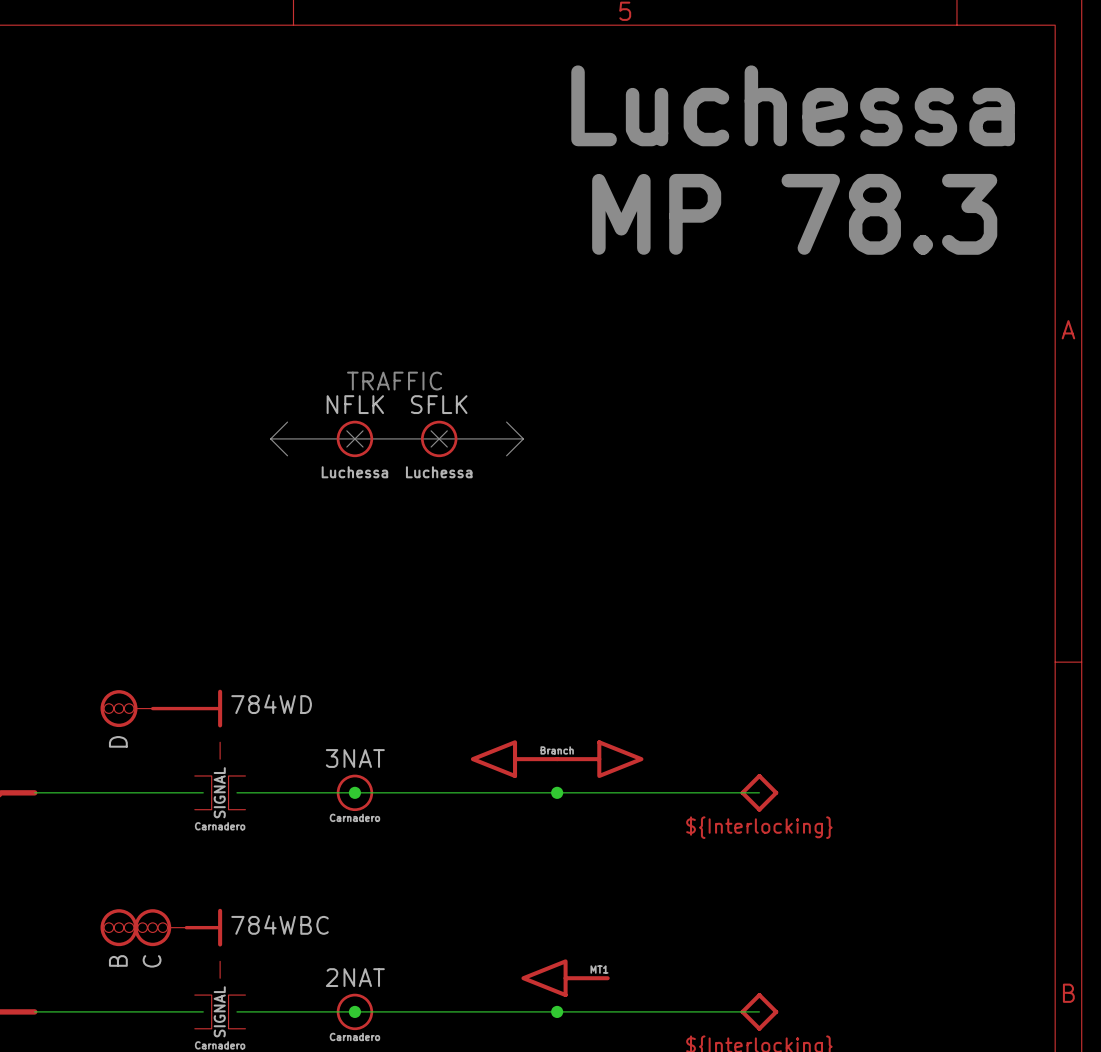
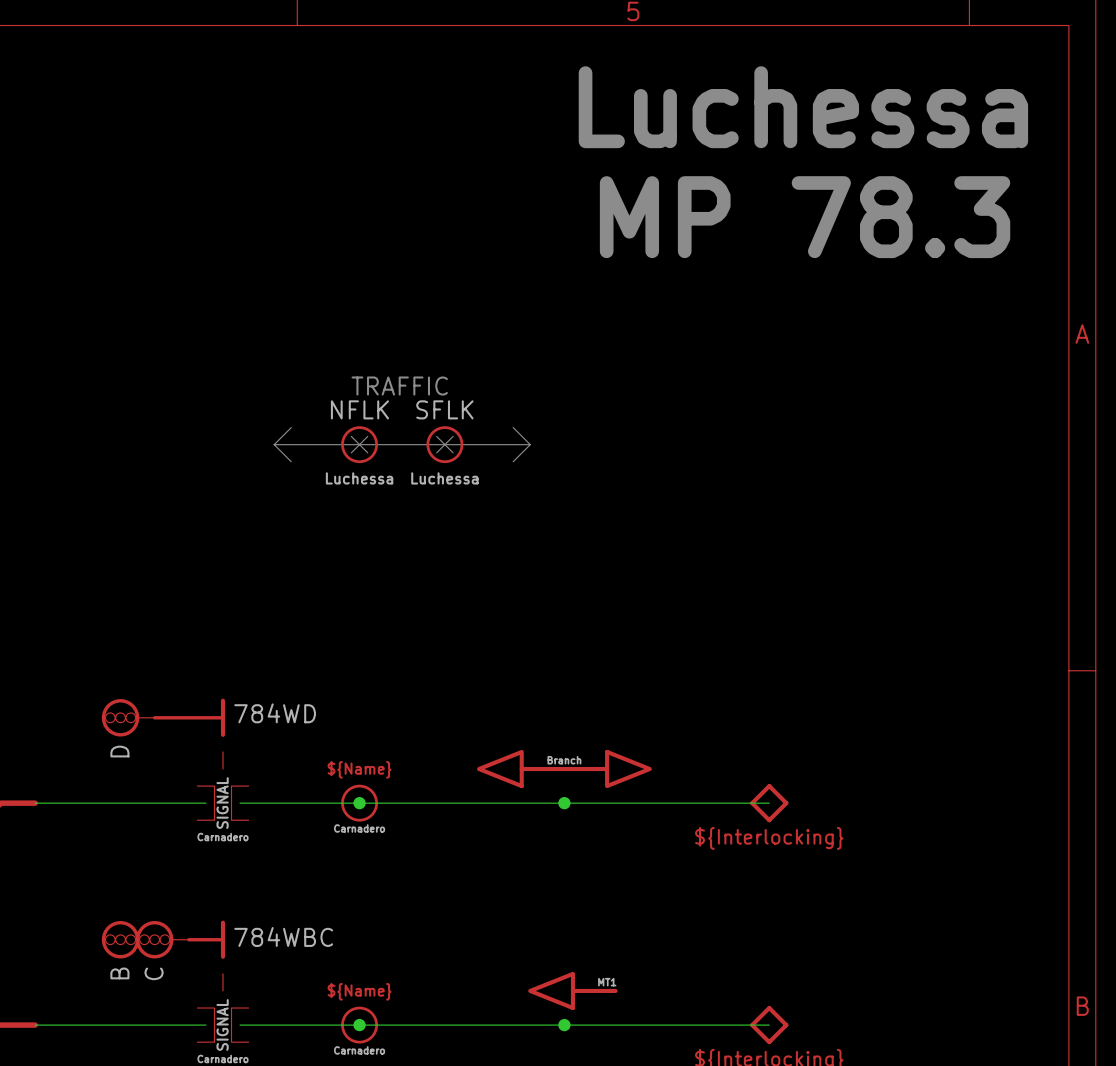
part value: 3NAT (355, 758) -> none
part text: none -> ${Name} (359, 769)
part value: 2NAT (355, 977) -> none
part text: none -> ${Name} (359, 991)

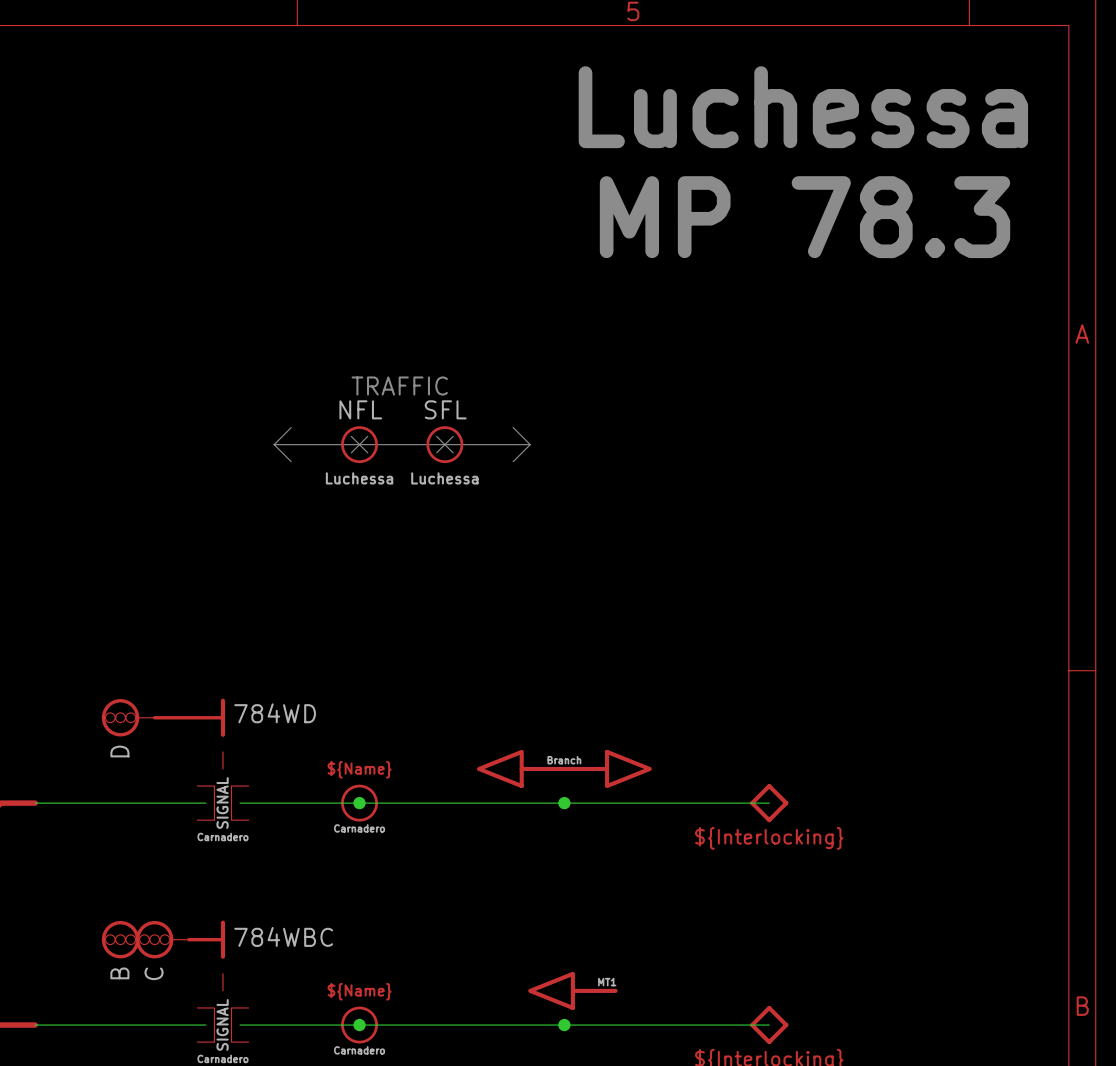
part value: NFLK (359, 409) -> NFL (360, 409)
part value: SFLK (444, 409) -> SFL (445, 409)

